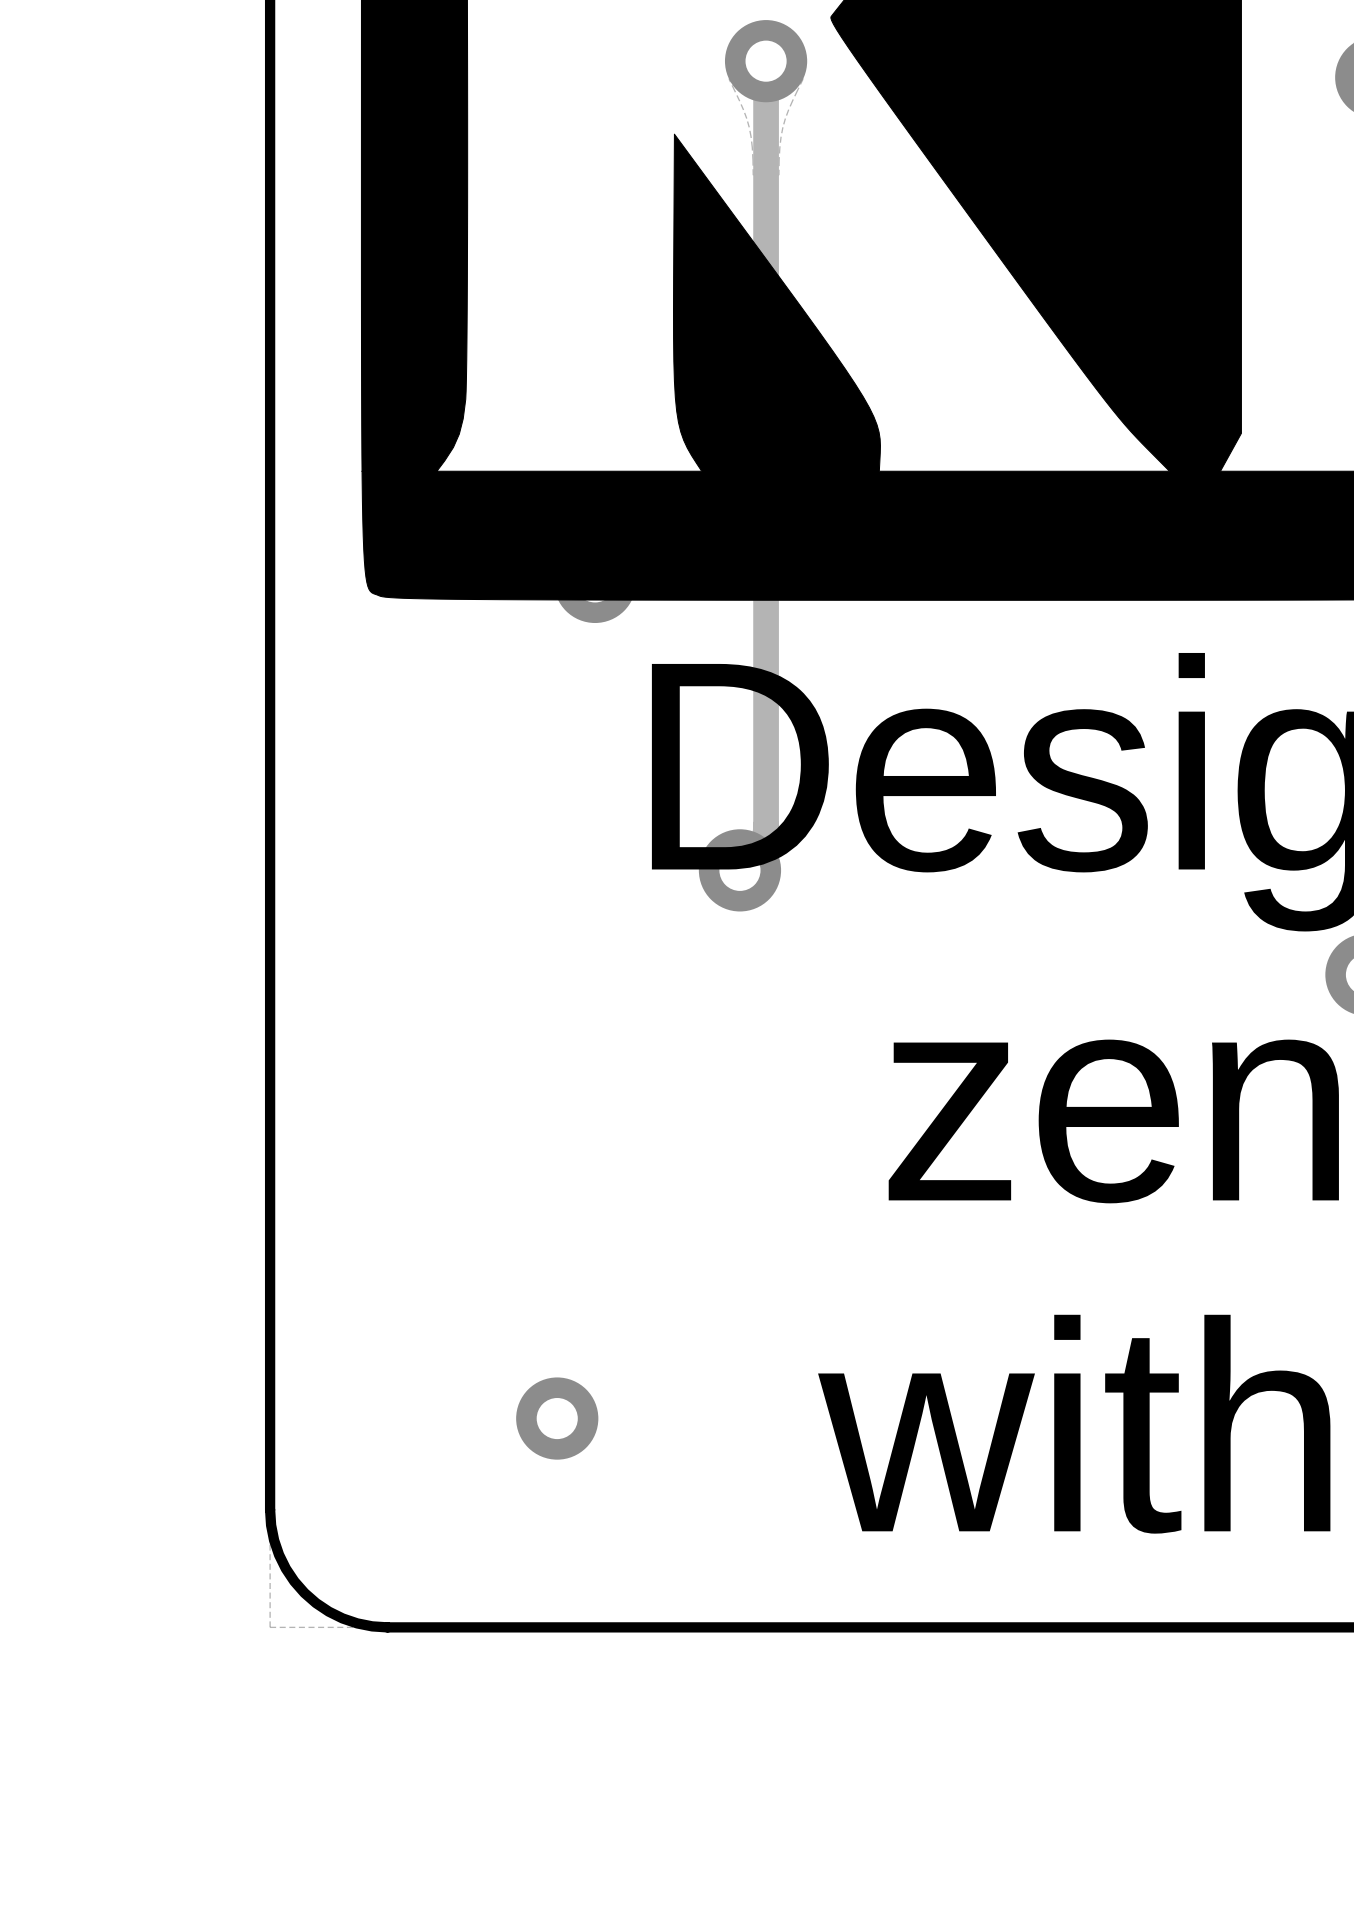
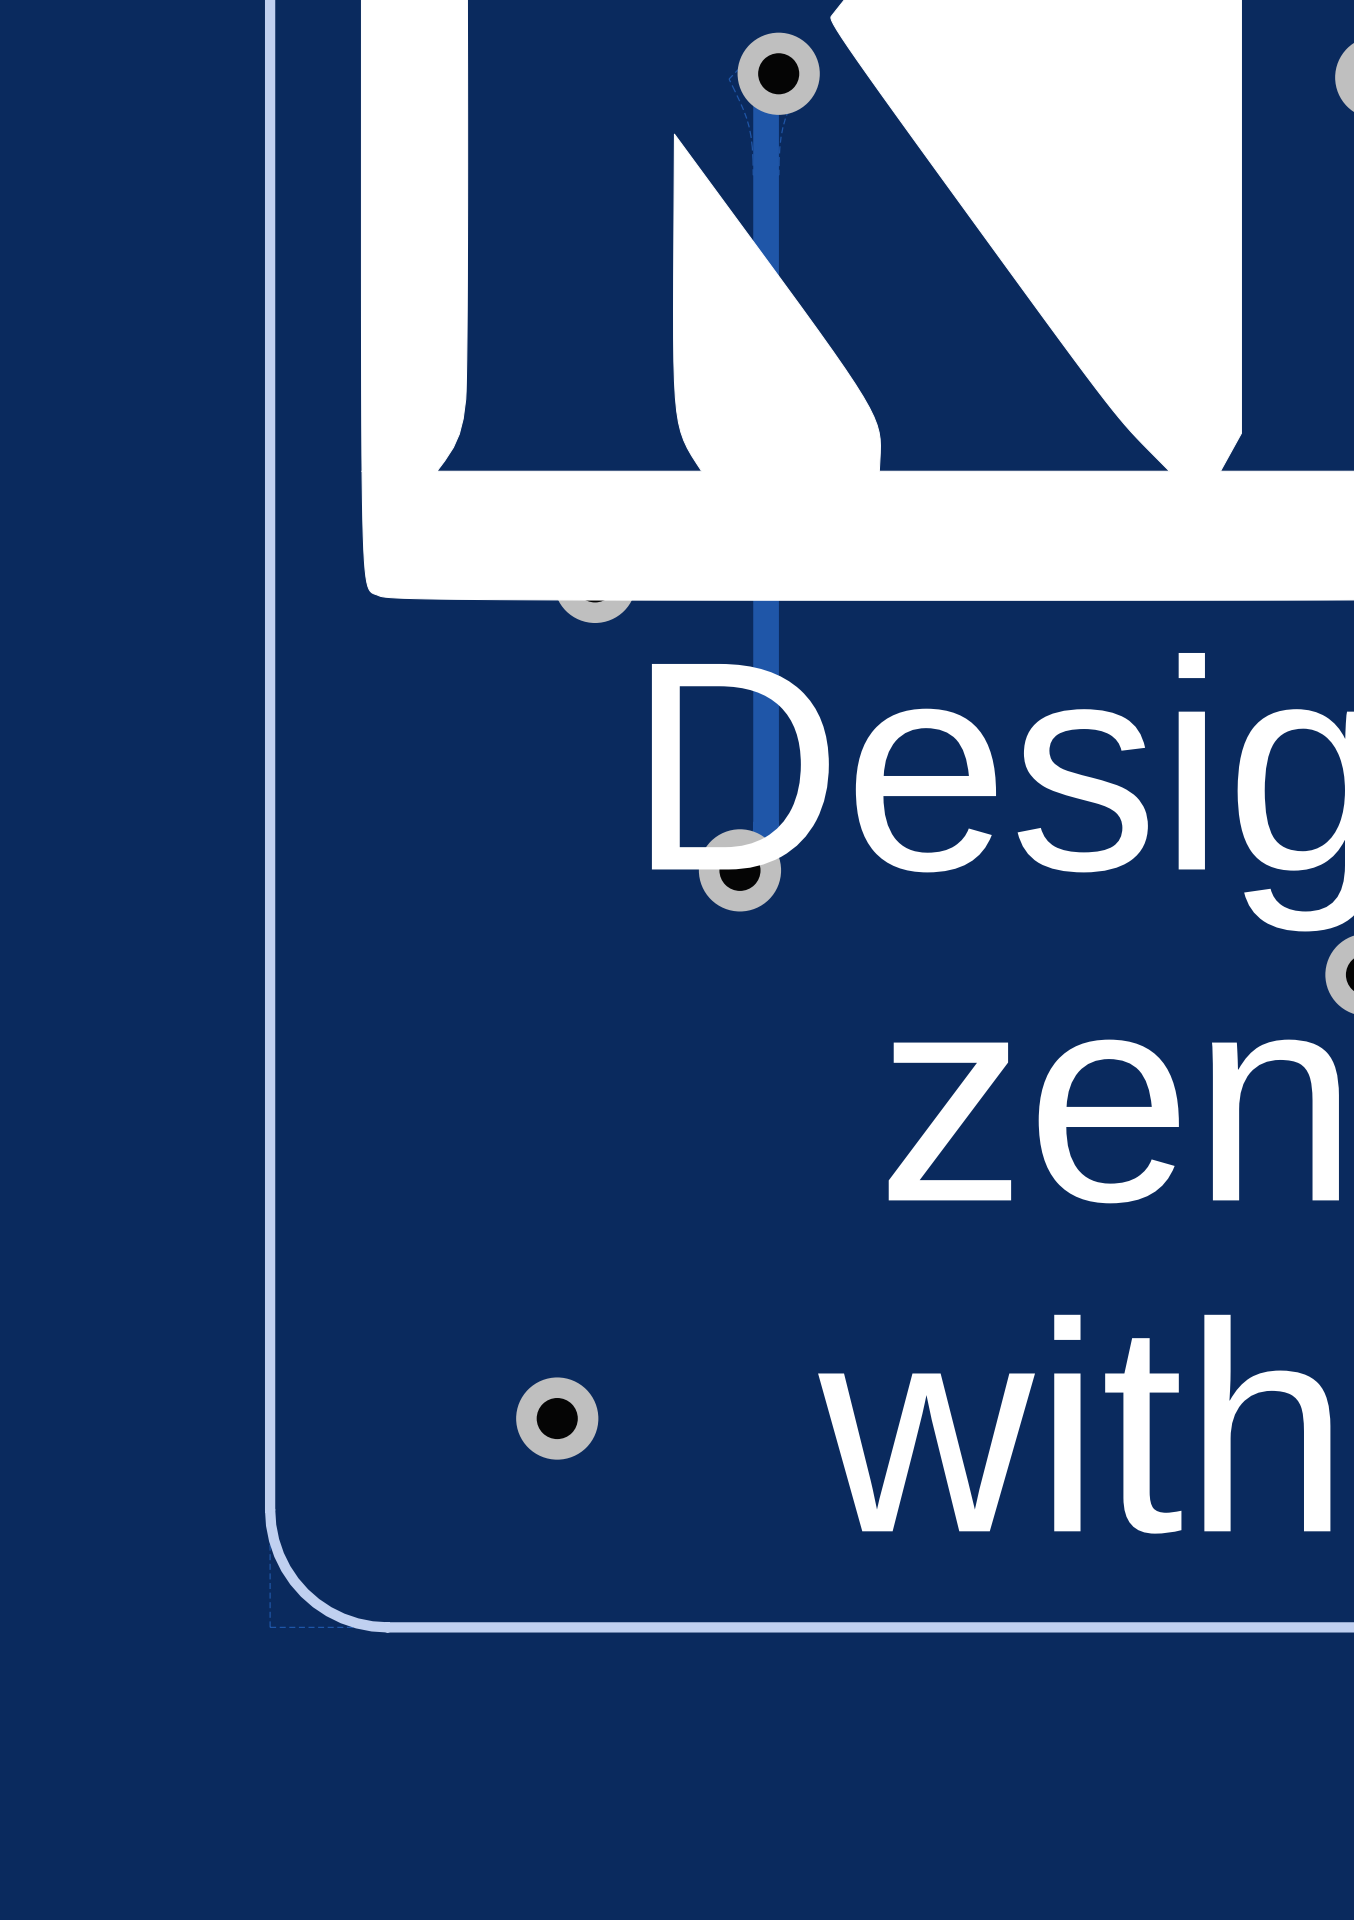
via position: (766, 61) -> (778, 73)

